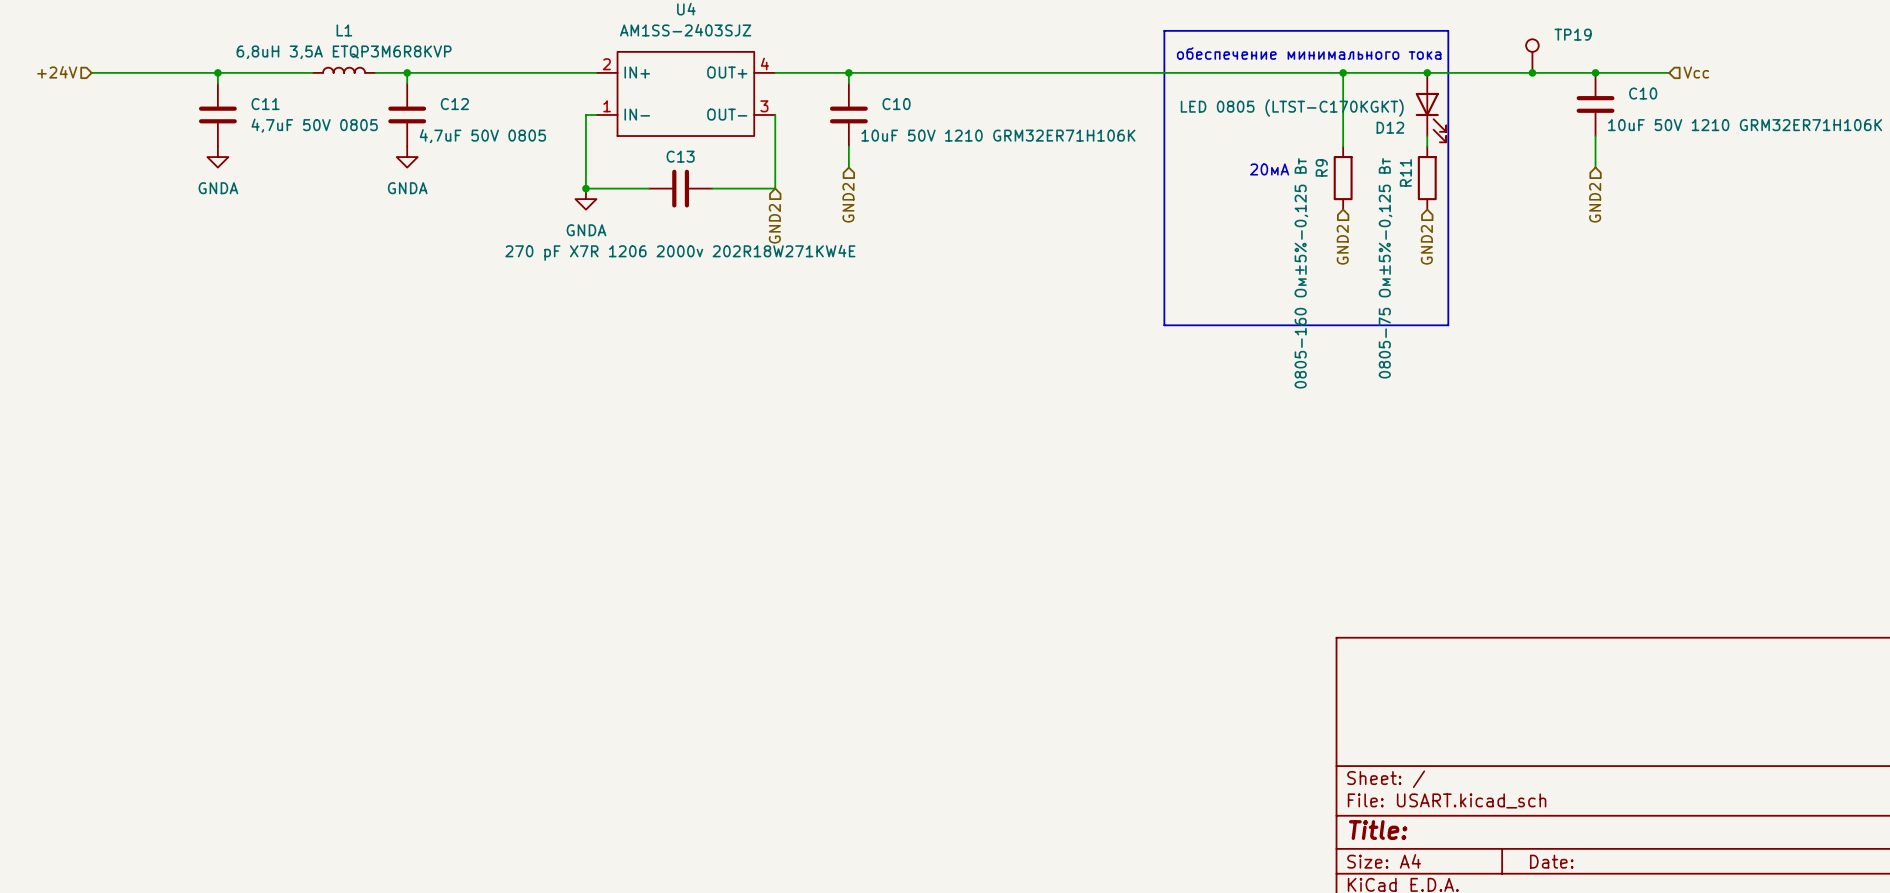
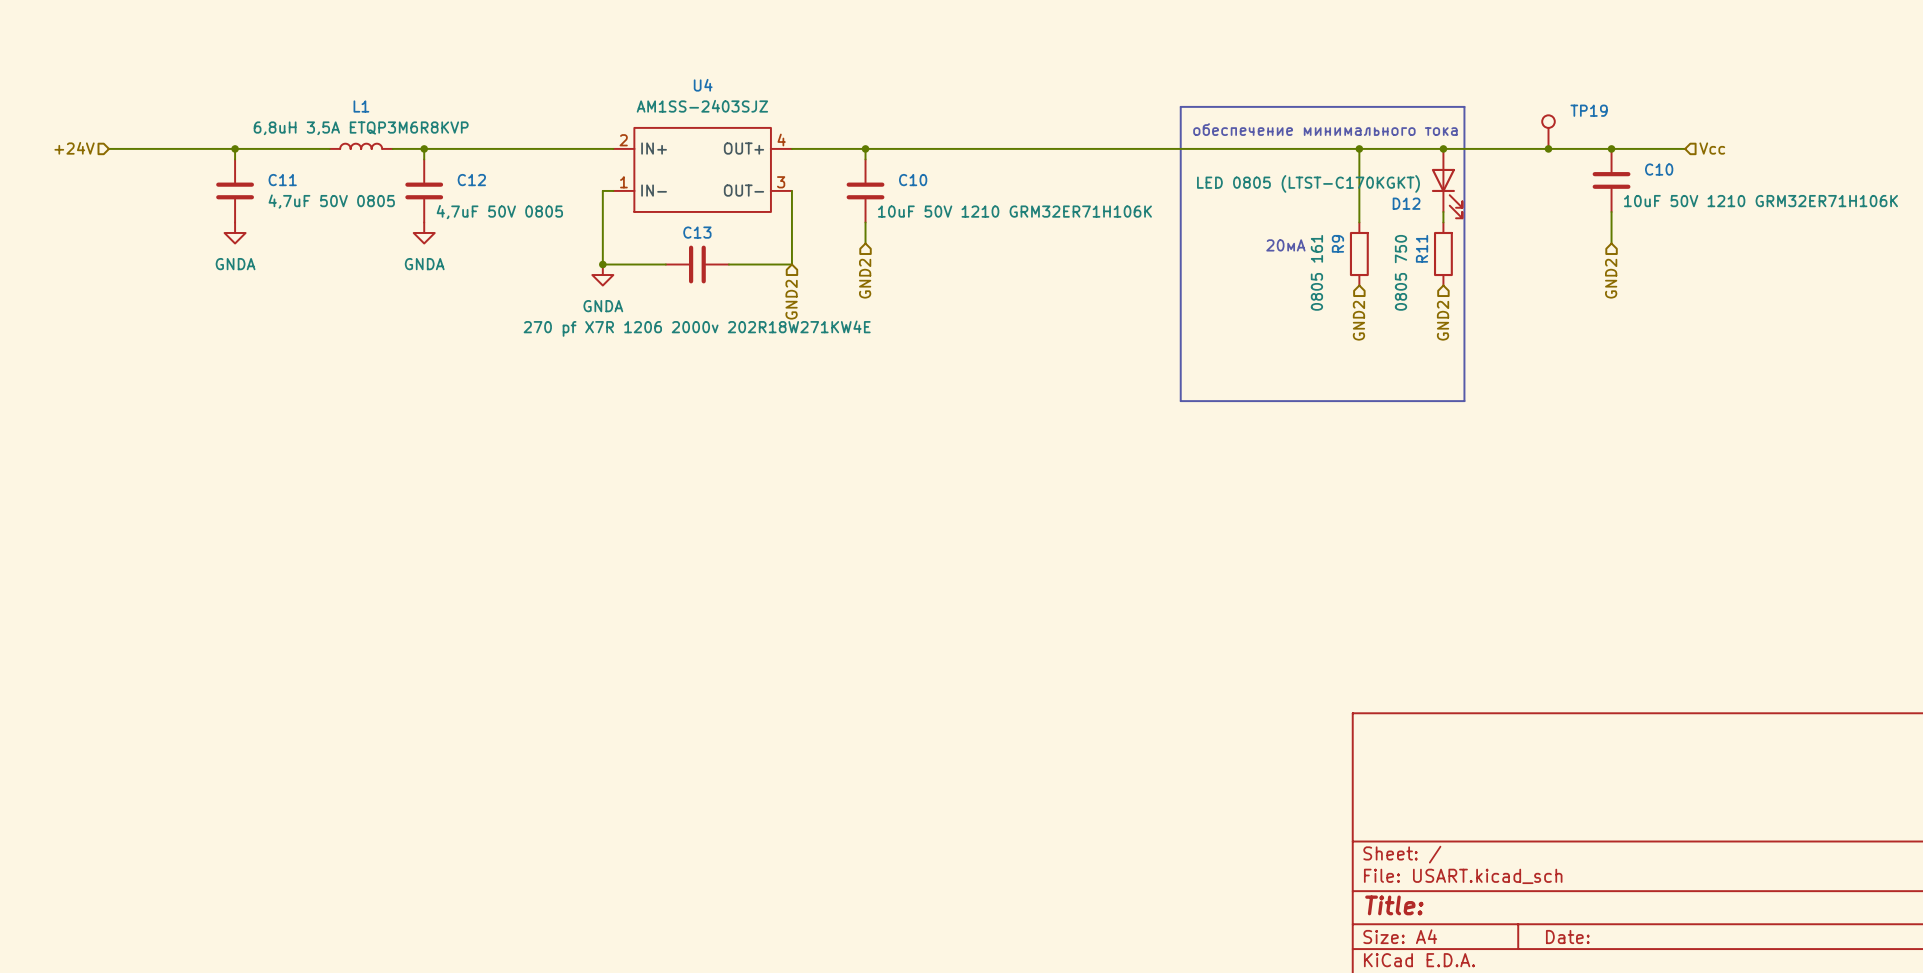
C13 value: 270 pF X7R 1206 2000v 202R18W271KW4E (680, 252) -> 270 pf X7R 1206 2000v 202R18W271KW4E (697, 328)
R11 value: 0805-75 Ом±5%-0,125 Вт (1385, 268) -> 0805 750 (1401, 272)
R9 value: 0805-160 Ом±5%-0,125 Вт (1301, 273) -> 0805 161 (1316, 272)

